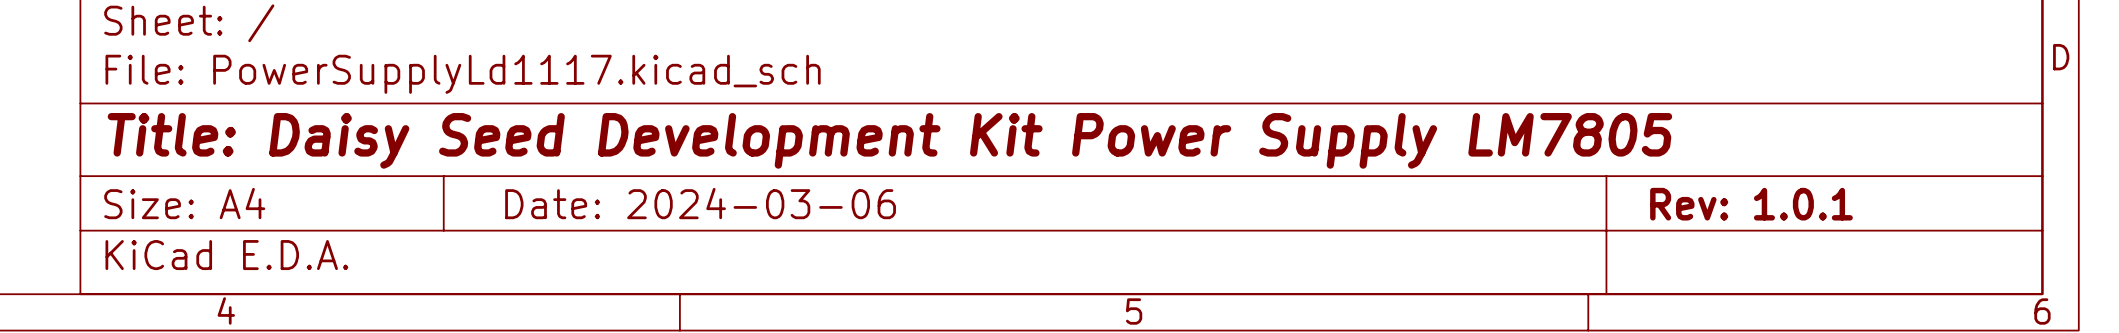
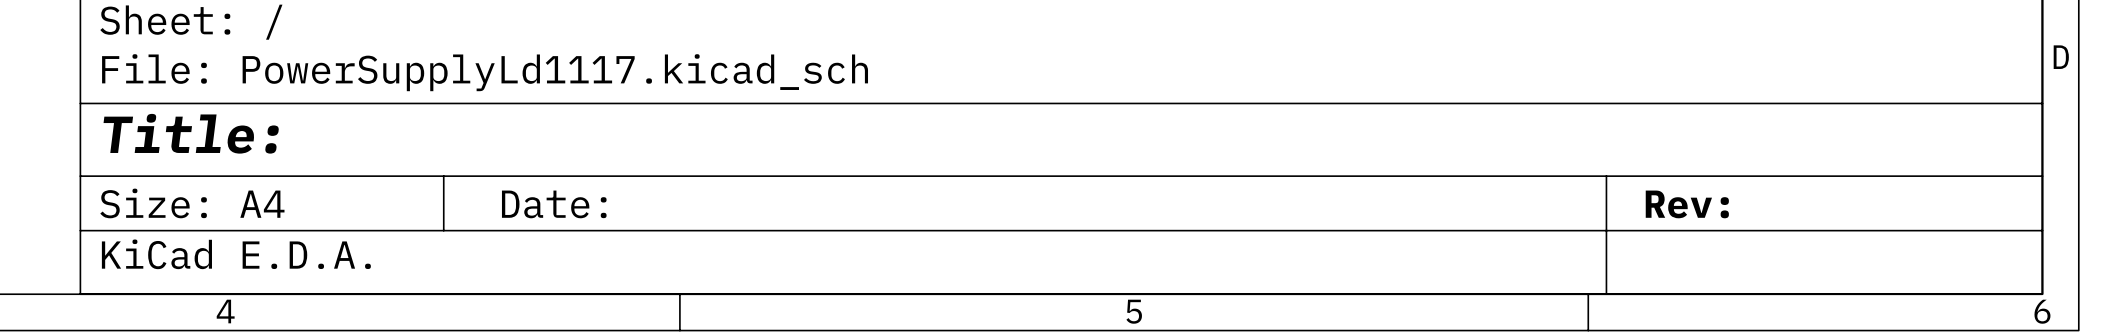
title block: Title: Daisy Seed Development Kit Power Supply LM7805 (889, 140) -> Title: (191, 133)
title block: Date: 2024-03-06 (700, 203) -> Date: (554, 204)
title block: Rev: 1.0.1 (1751, 204) -> Rev: (1687, 204)

